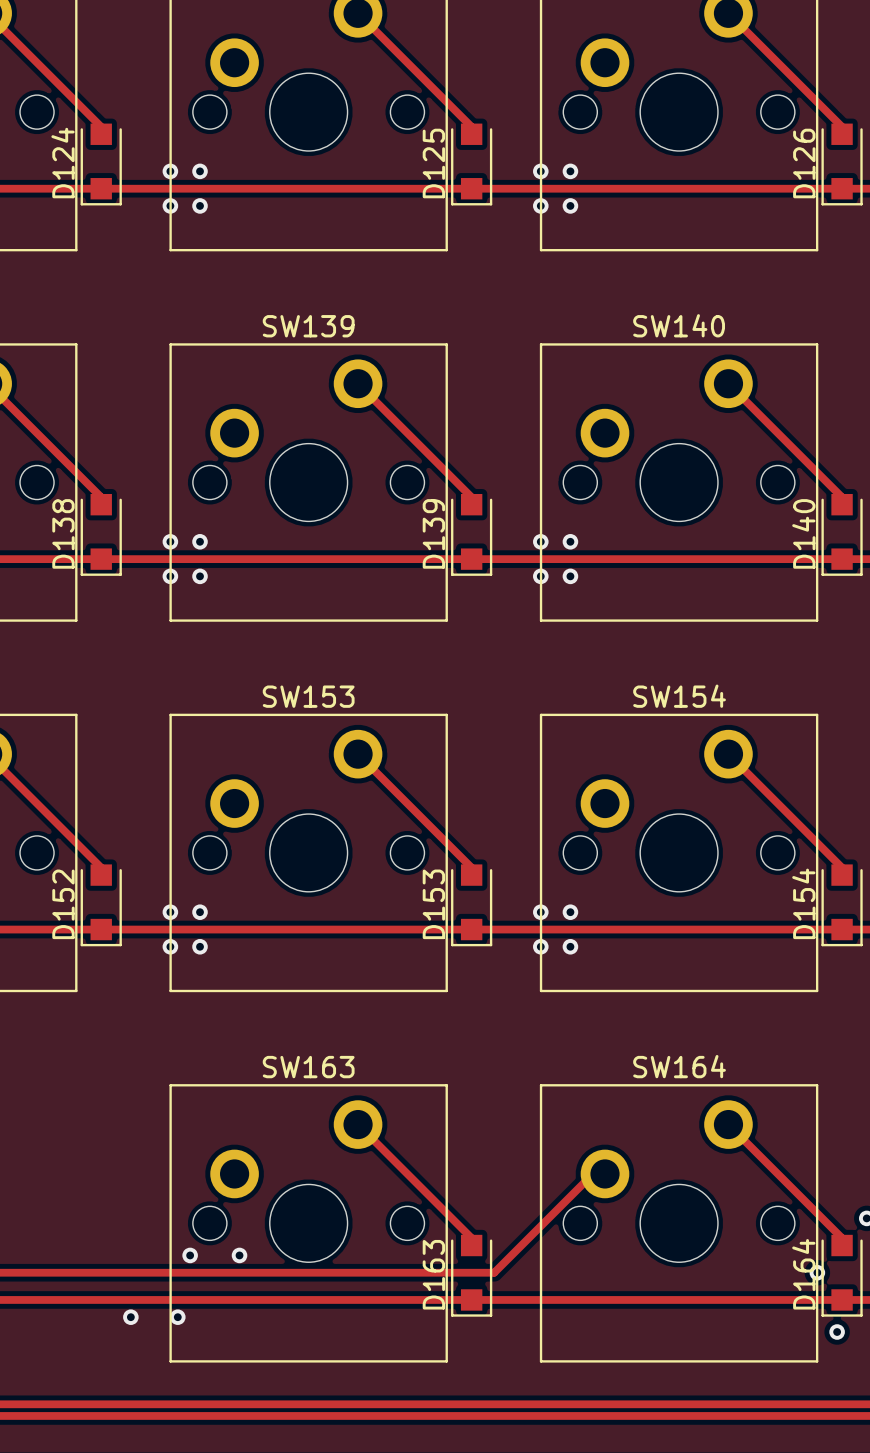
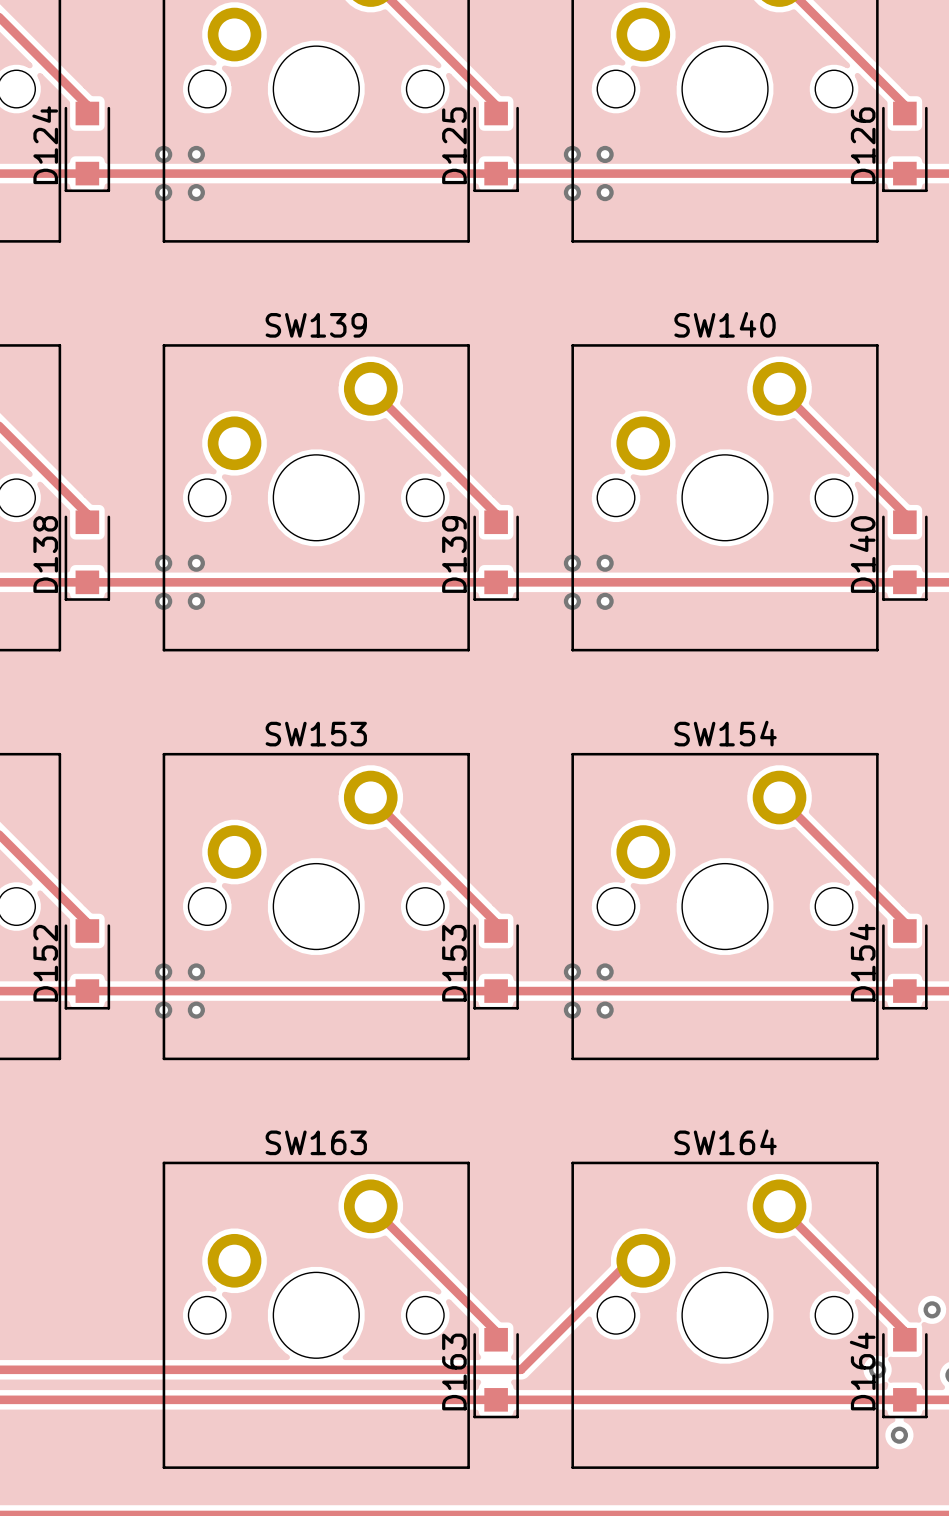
via: (190, 1255) -> none
via: (239, 1255) -> none
via: (130, 1317) -> none
via: (177, 1317) -> none

